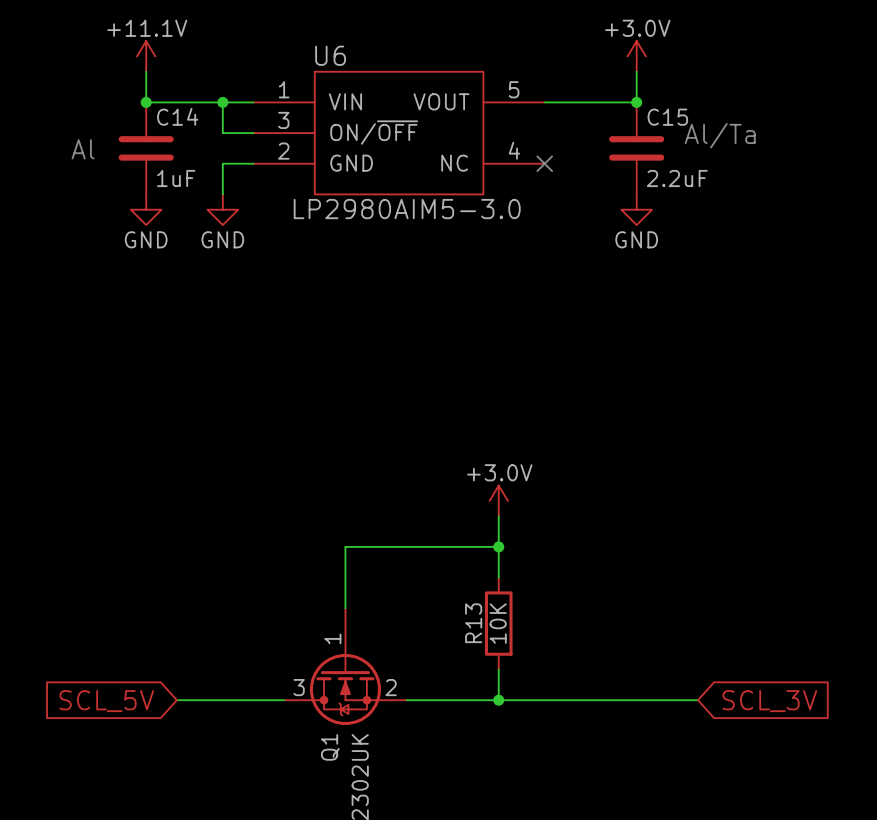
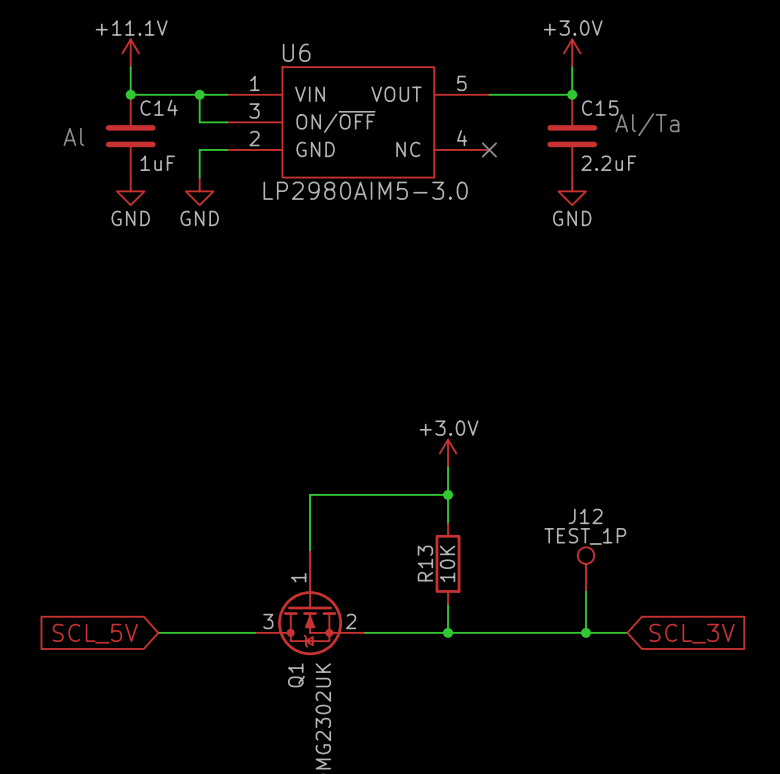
J12: none -> TEST_1P (586, 569)
wire: none -> (586, 591) (586, 632)
junction: none -> (586, 632)

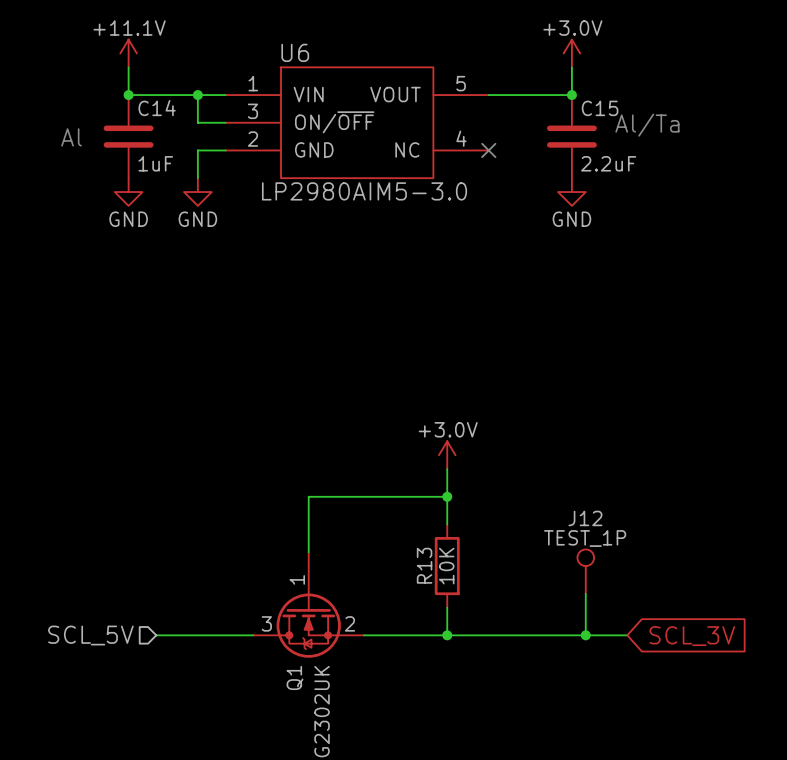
hierarchical label: none -> SCL_5V (90, 635)
global label: SCL_5V (95, 633) -> none

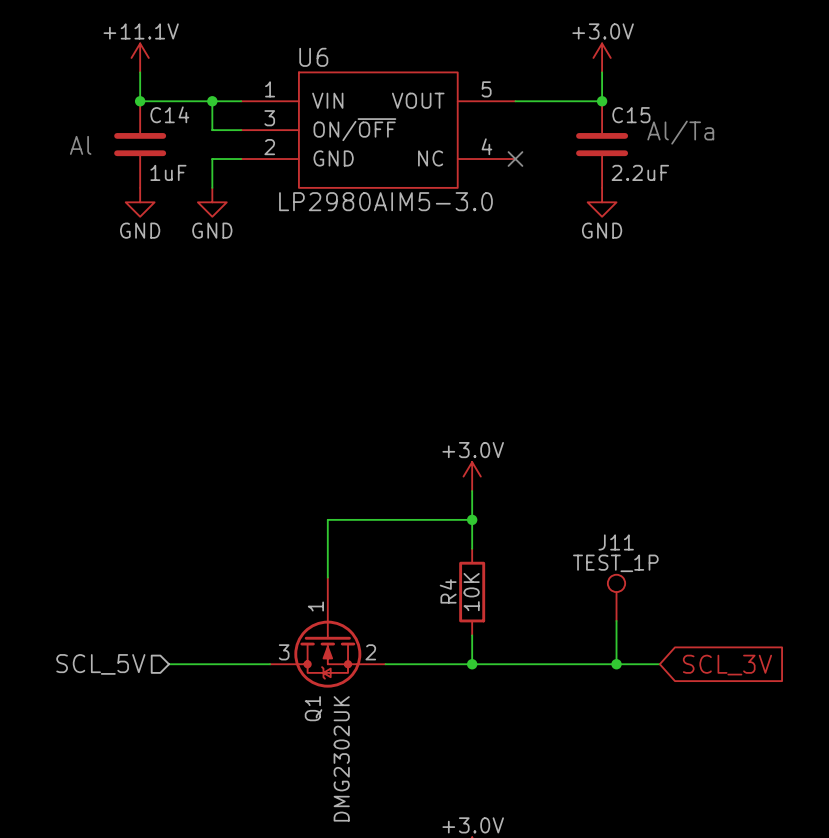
J12 name: J12 (585, 518) -> J11 (616, 542)
R13 name: R13 (424, 565) -> R4 (448, 591)

